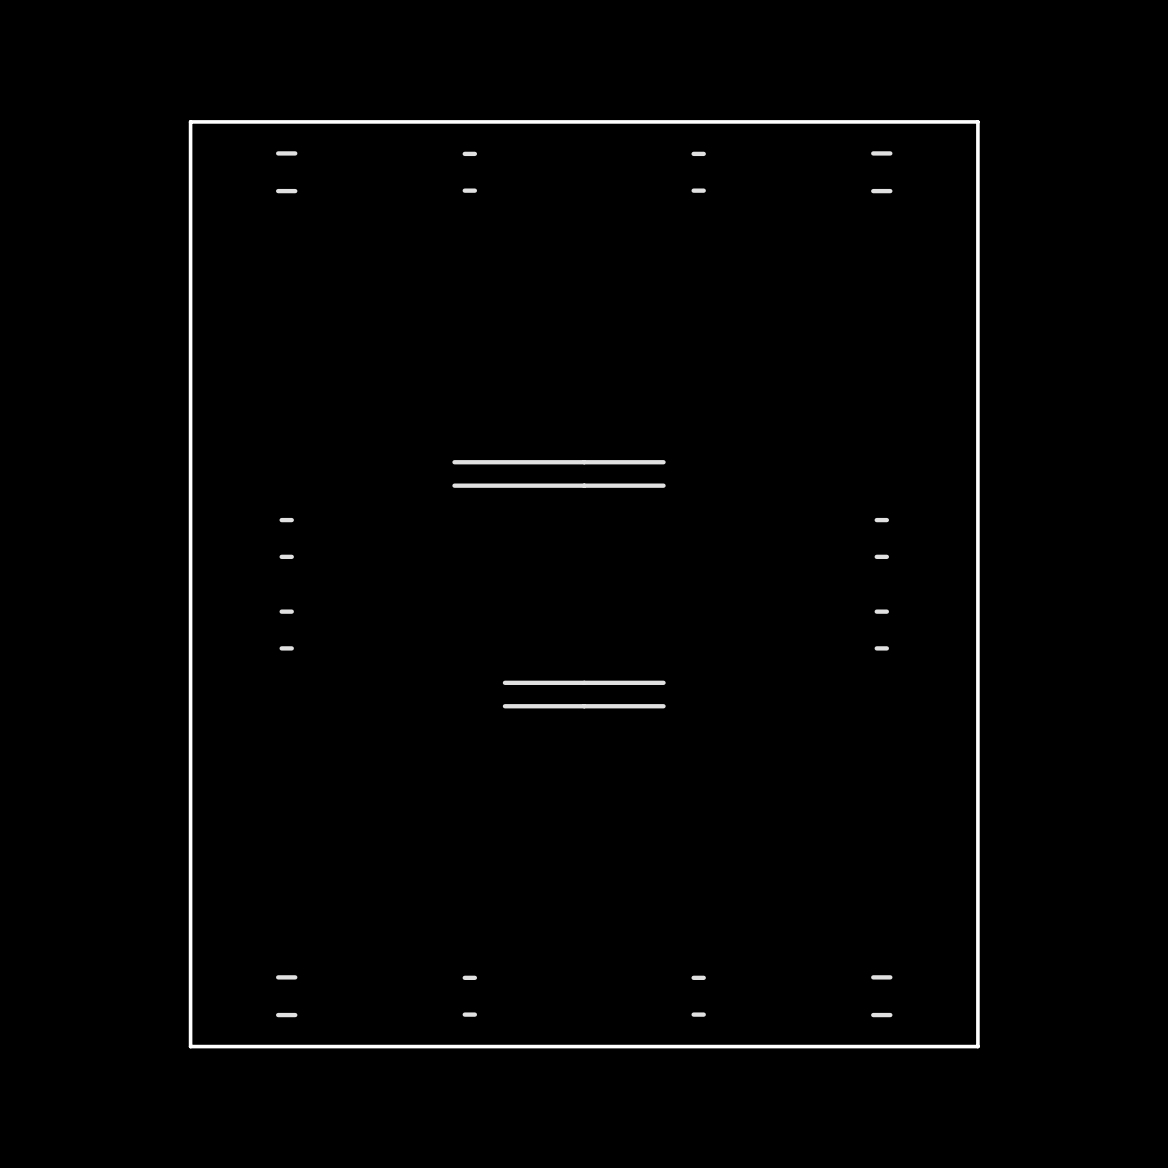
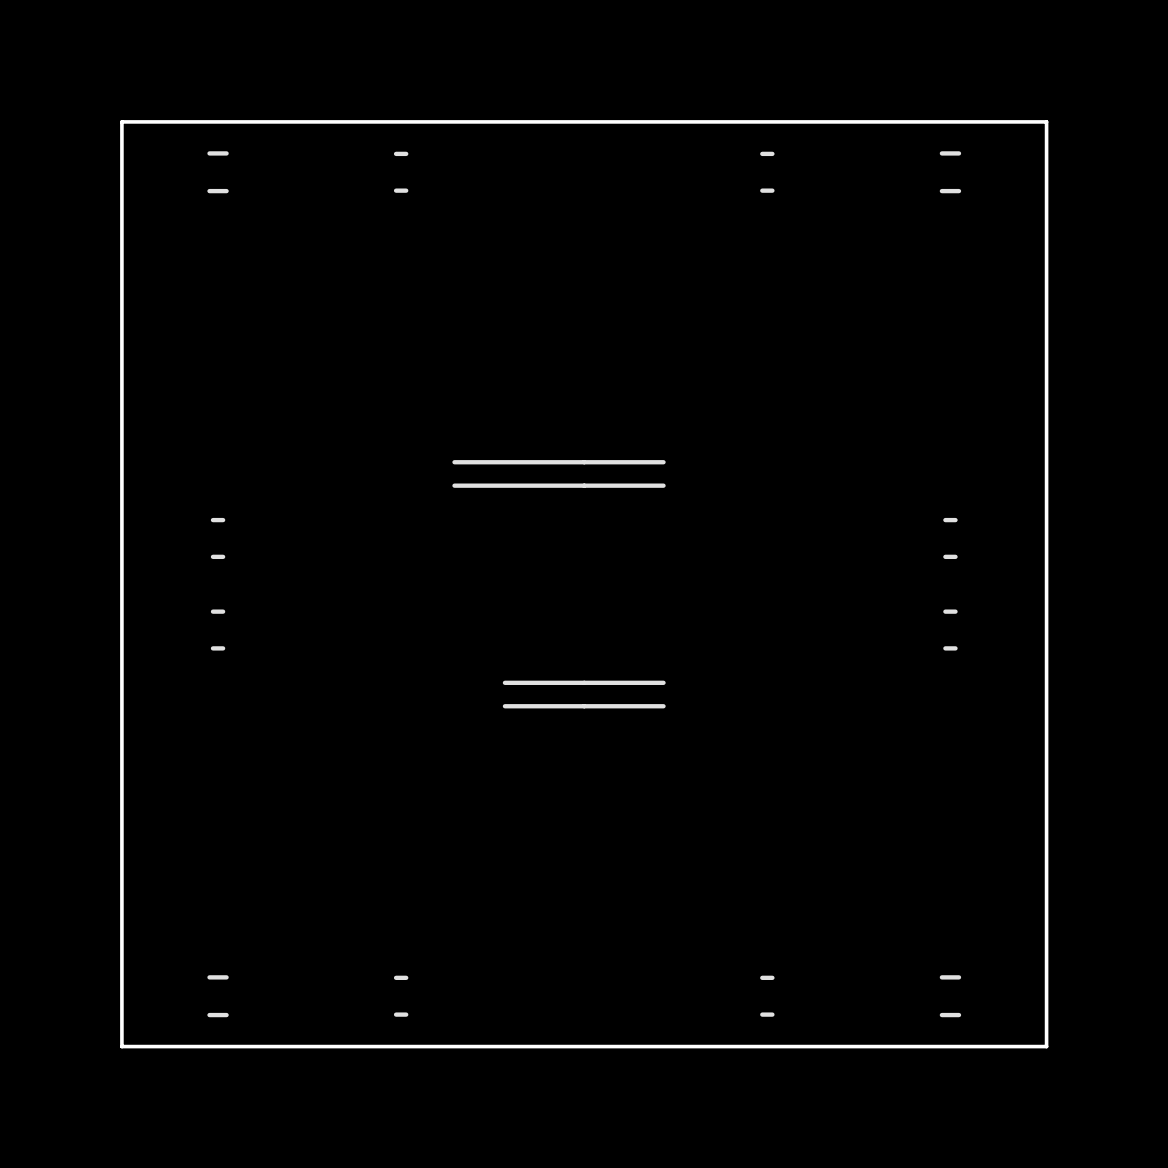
board edge: (190, 121) (190, 1046) -> (190, 121) (121, 121) (121, 1046) (190, 1046)
board edge: (977, 121) (977, 1046) -> (977, 121) (1046, 121) (1046, 1046) (977, 1046)
drawing position: (286, 172) -> (218, 172)
drawing position: (469, 172) -> (401, 172)
drawing position: (698, 172) -> (767, 172)
drawing position: (881, 172) -> (950, 172)
drawing: none -> [210, 517, 226, 560]
drawing: [279, 517, 294, 560] -> none
drawing: [874, 517, 890, 560] -> none
drawing: none -> [943, 517, 958, 560]
drawing: none -> [210, 609, 226, 651]
drawing: [279, 609, 294, 651] -> none
drawing: [874, 609, 890, 651] -> none
drawing: none -> [943, 609, 958, 651]
drawing position: (286, 996) -> (218, 996)
drawing position: (469, 996) -> (401, 996)
drawing position: (698, 996) -> (767, 996)
drawing position: (881, 996) -> (950, 996)

